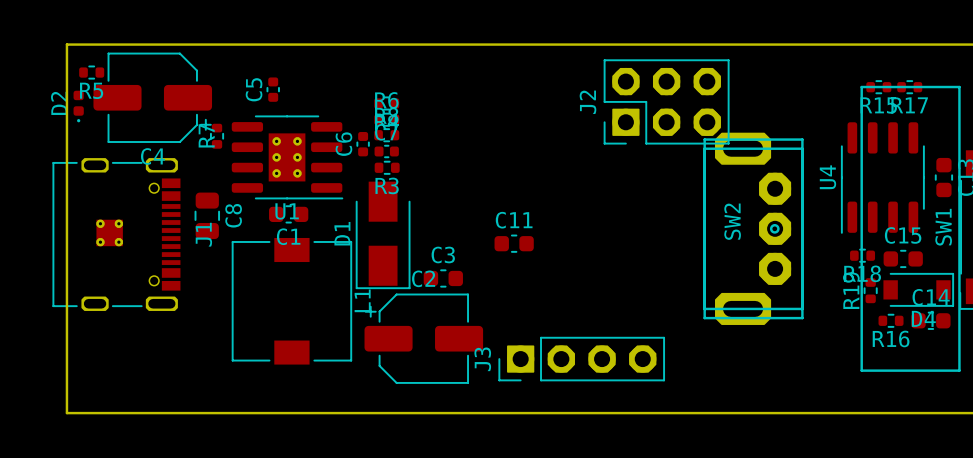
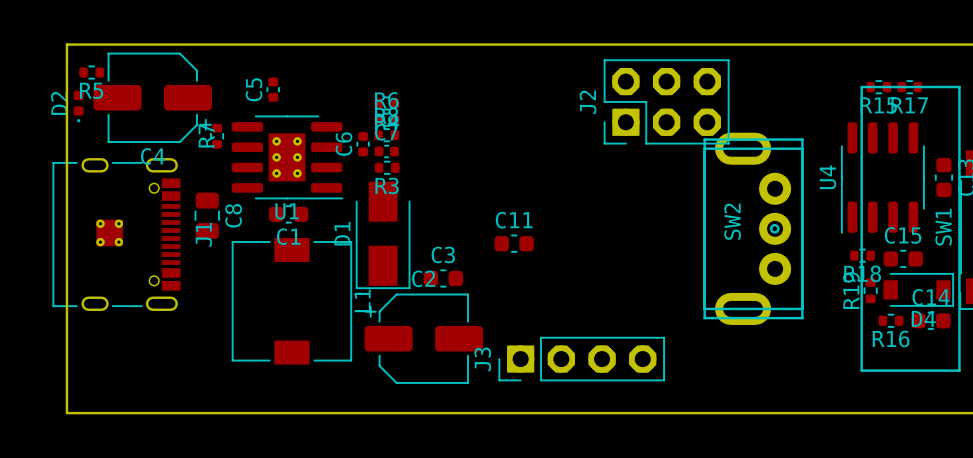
SW2 footprint: [703, 132, 804, 325] -> [703, 132, 804, 325]
J1 footprint: [52, 158, 181, 311] -> [52, 158, 181, 311]

